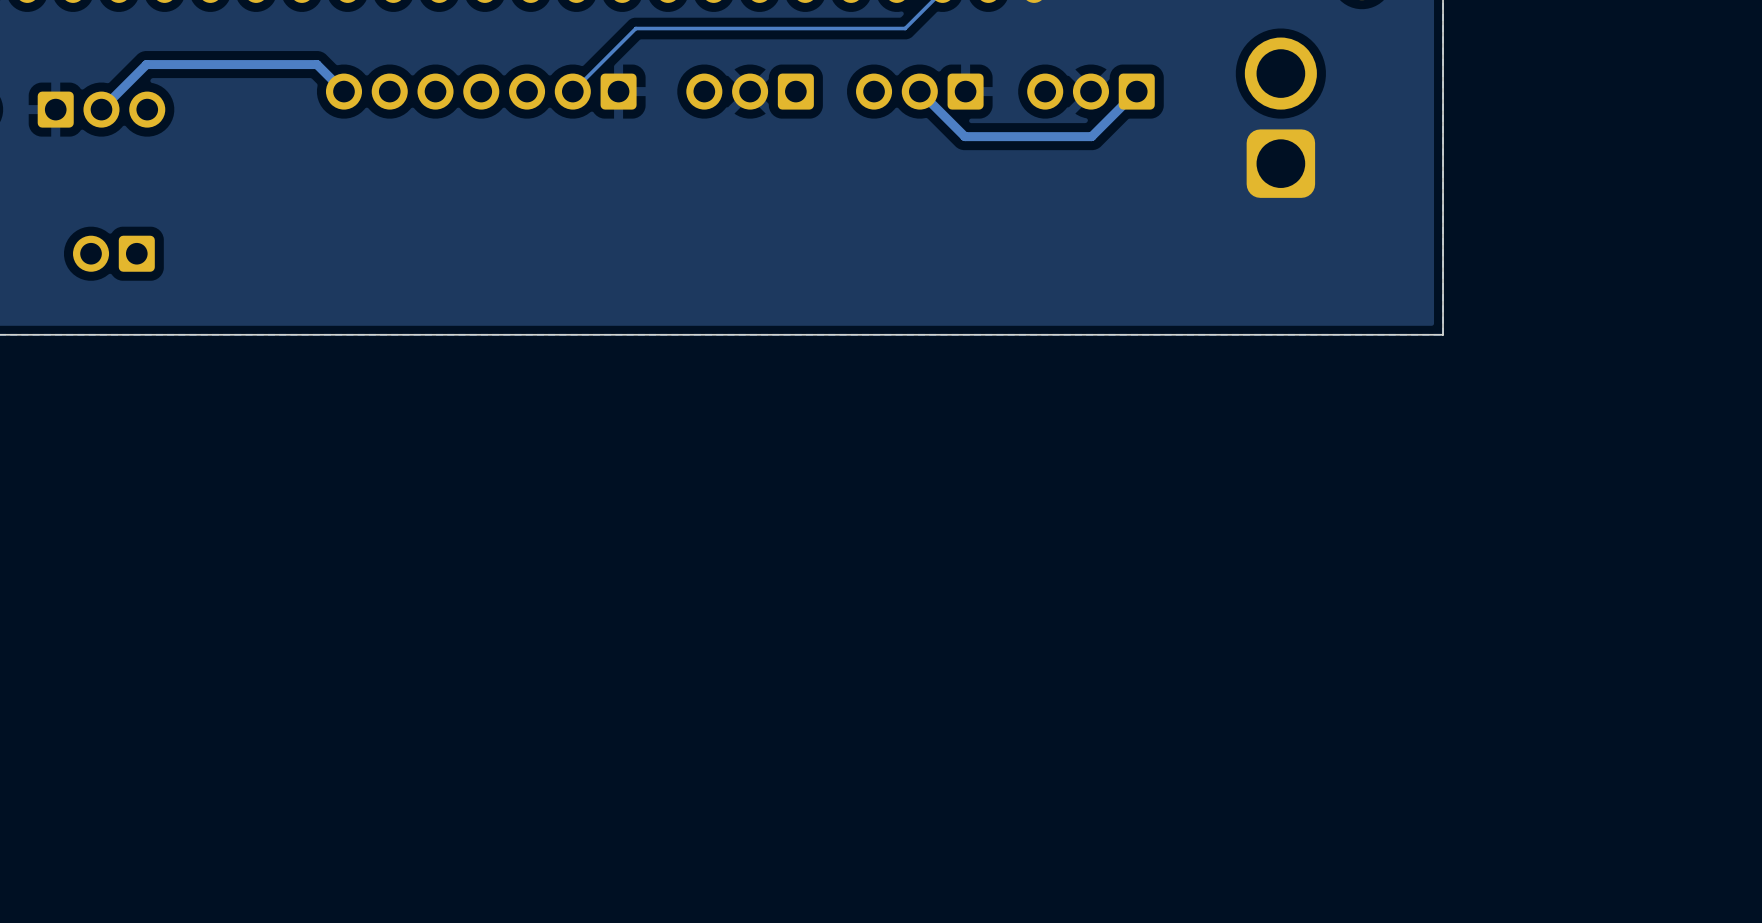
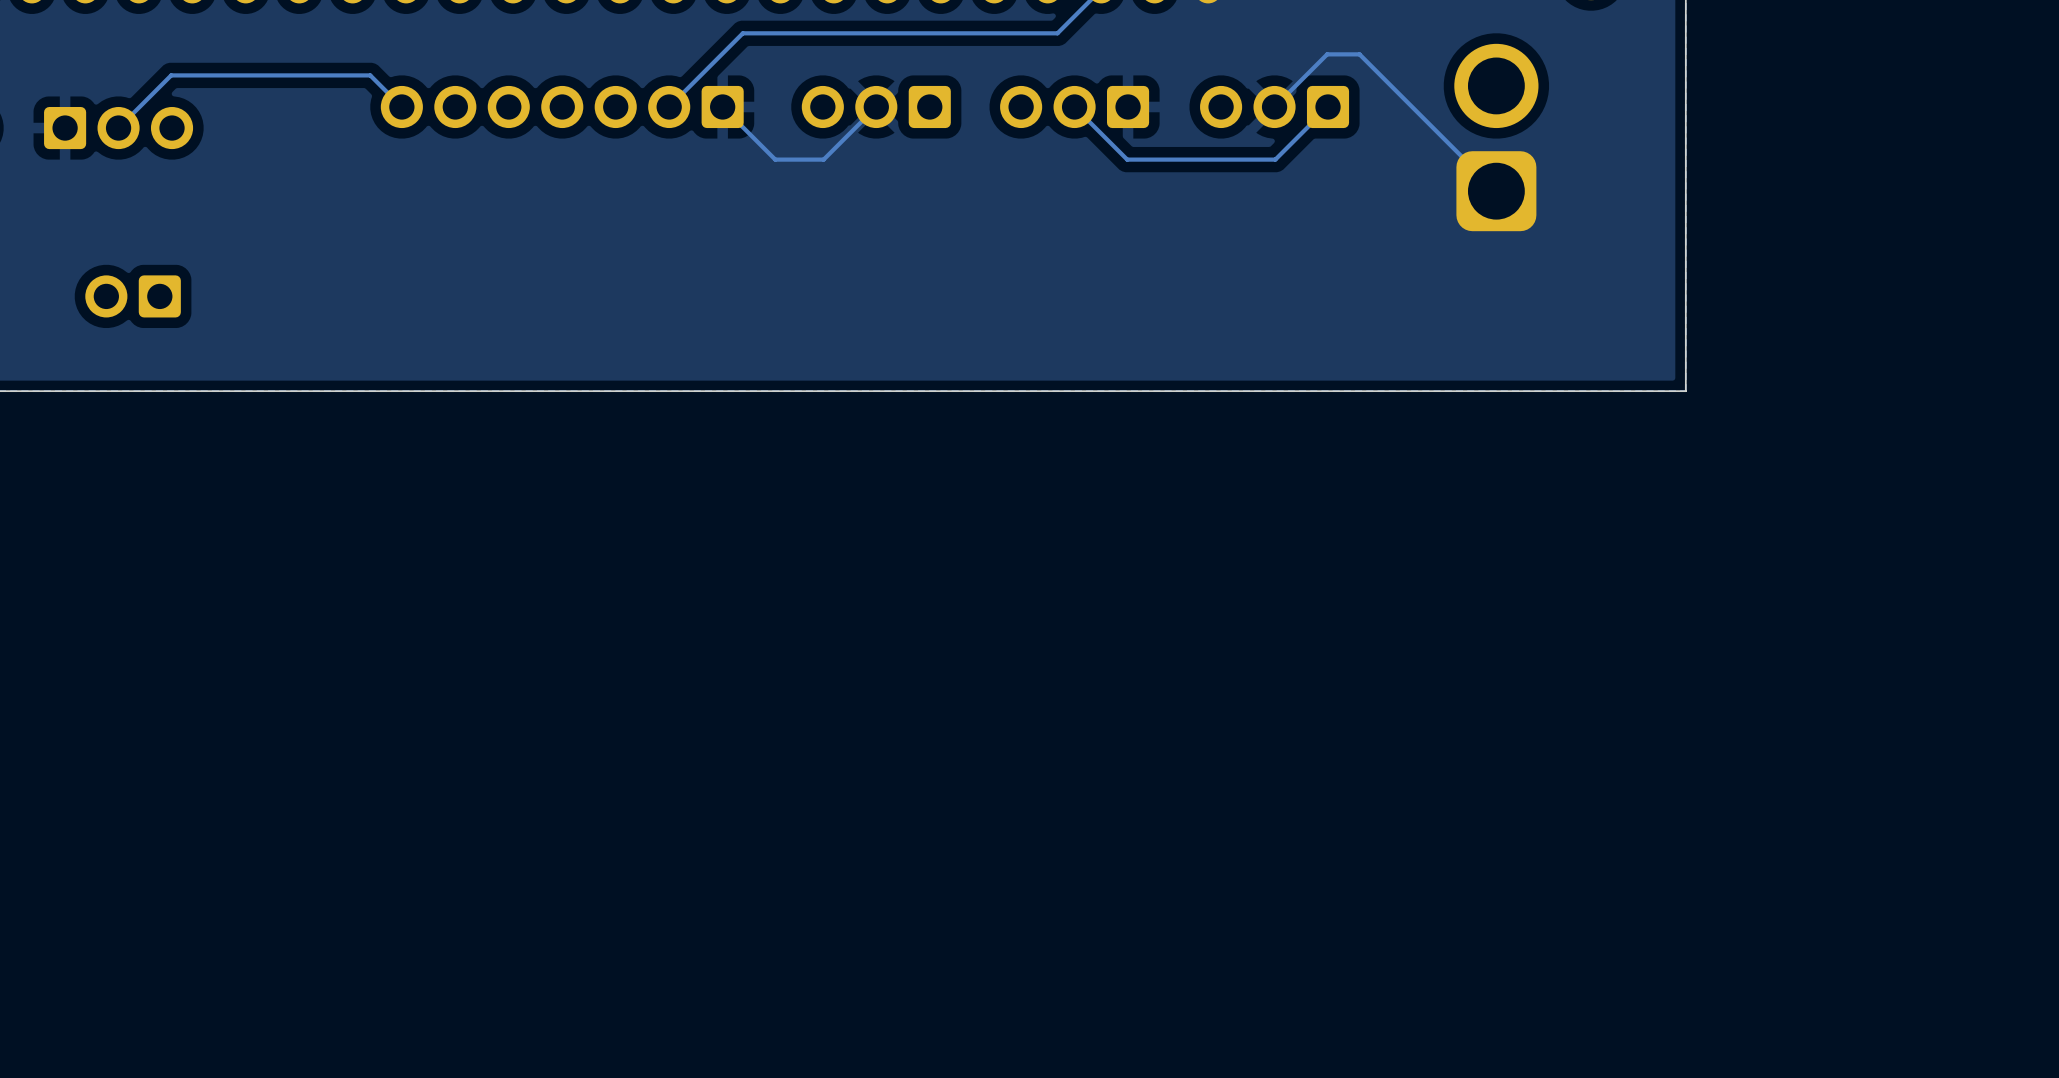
track width: thick (343, 91) (316, 64) (146, 64) (101, 109) -> thin (401, 106) (370, 75) (171, 75) (118, 128)
track: none -> (876, 106) (823, 159) (775, 159) (722, 106)
track: none -> (1274, 106) (1327, 54) (1359, 54) (1496, 191)
track width: thick (1136, 91) (1091, 136) (964, 136) (919, 91) -> thin (1328, 106) (1275, 159) (1127, 159) (1074, 106)

